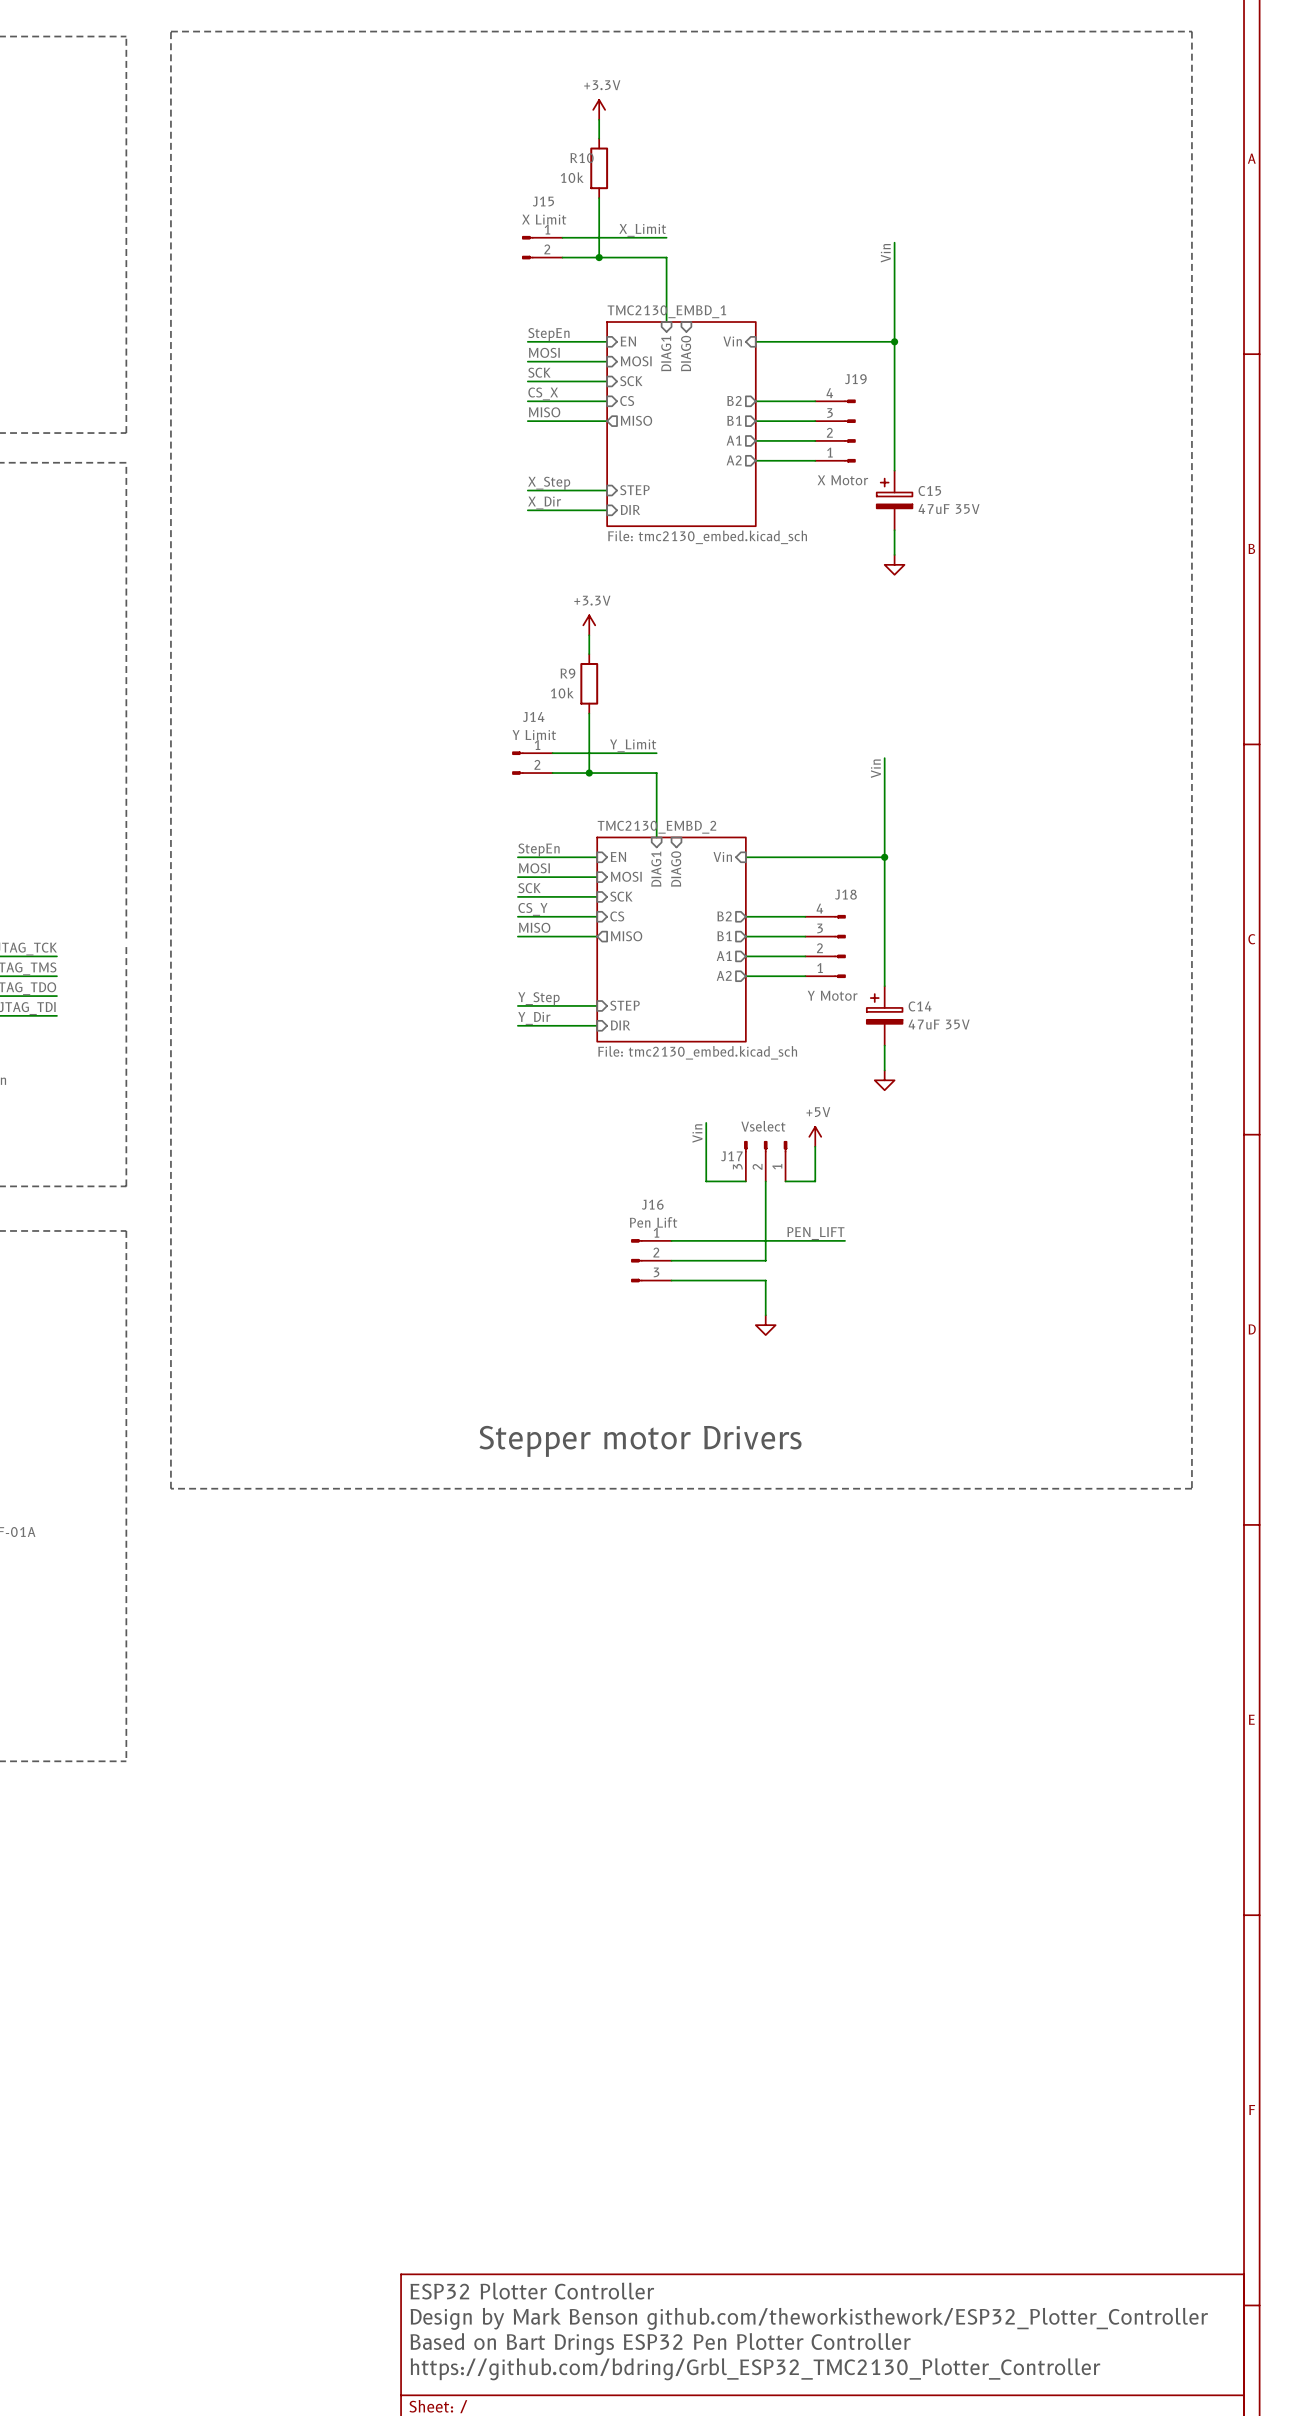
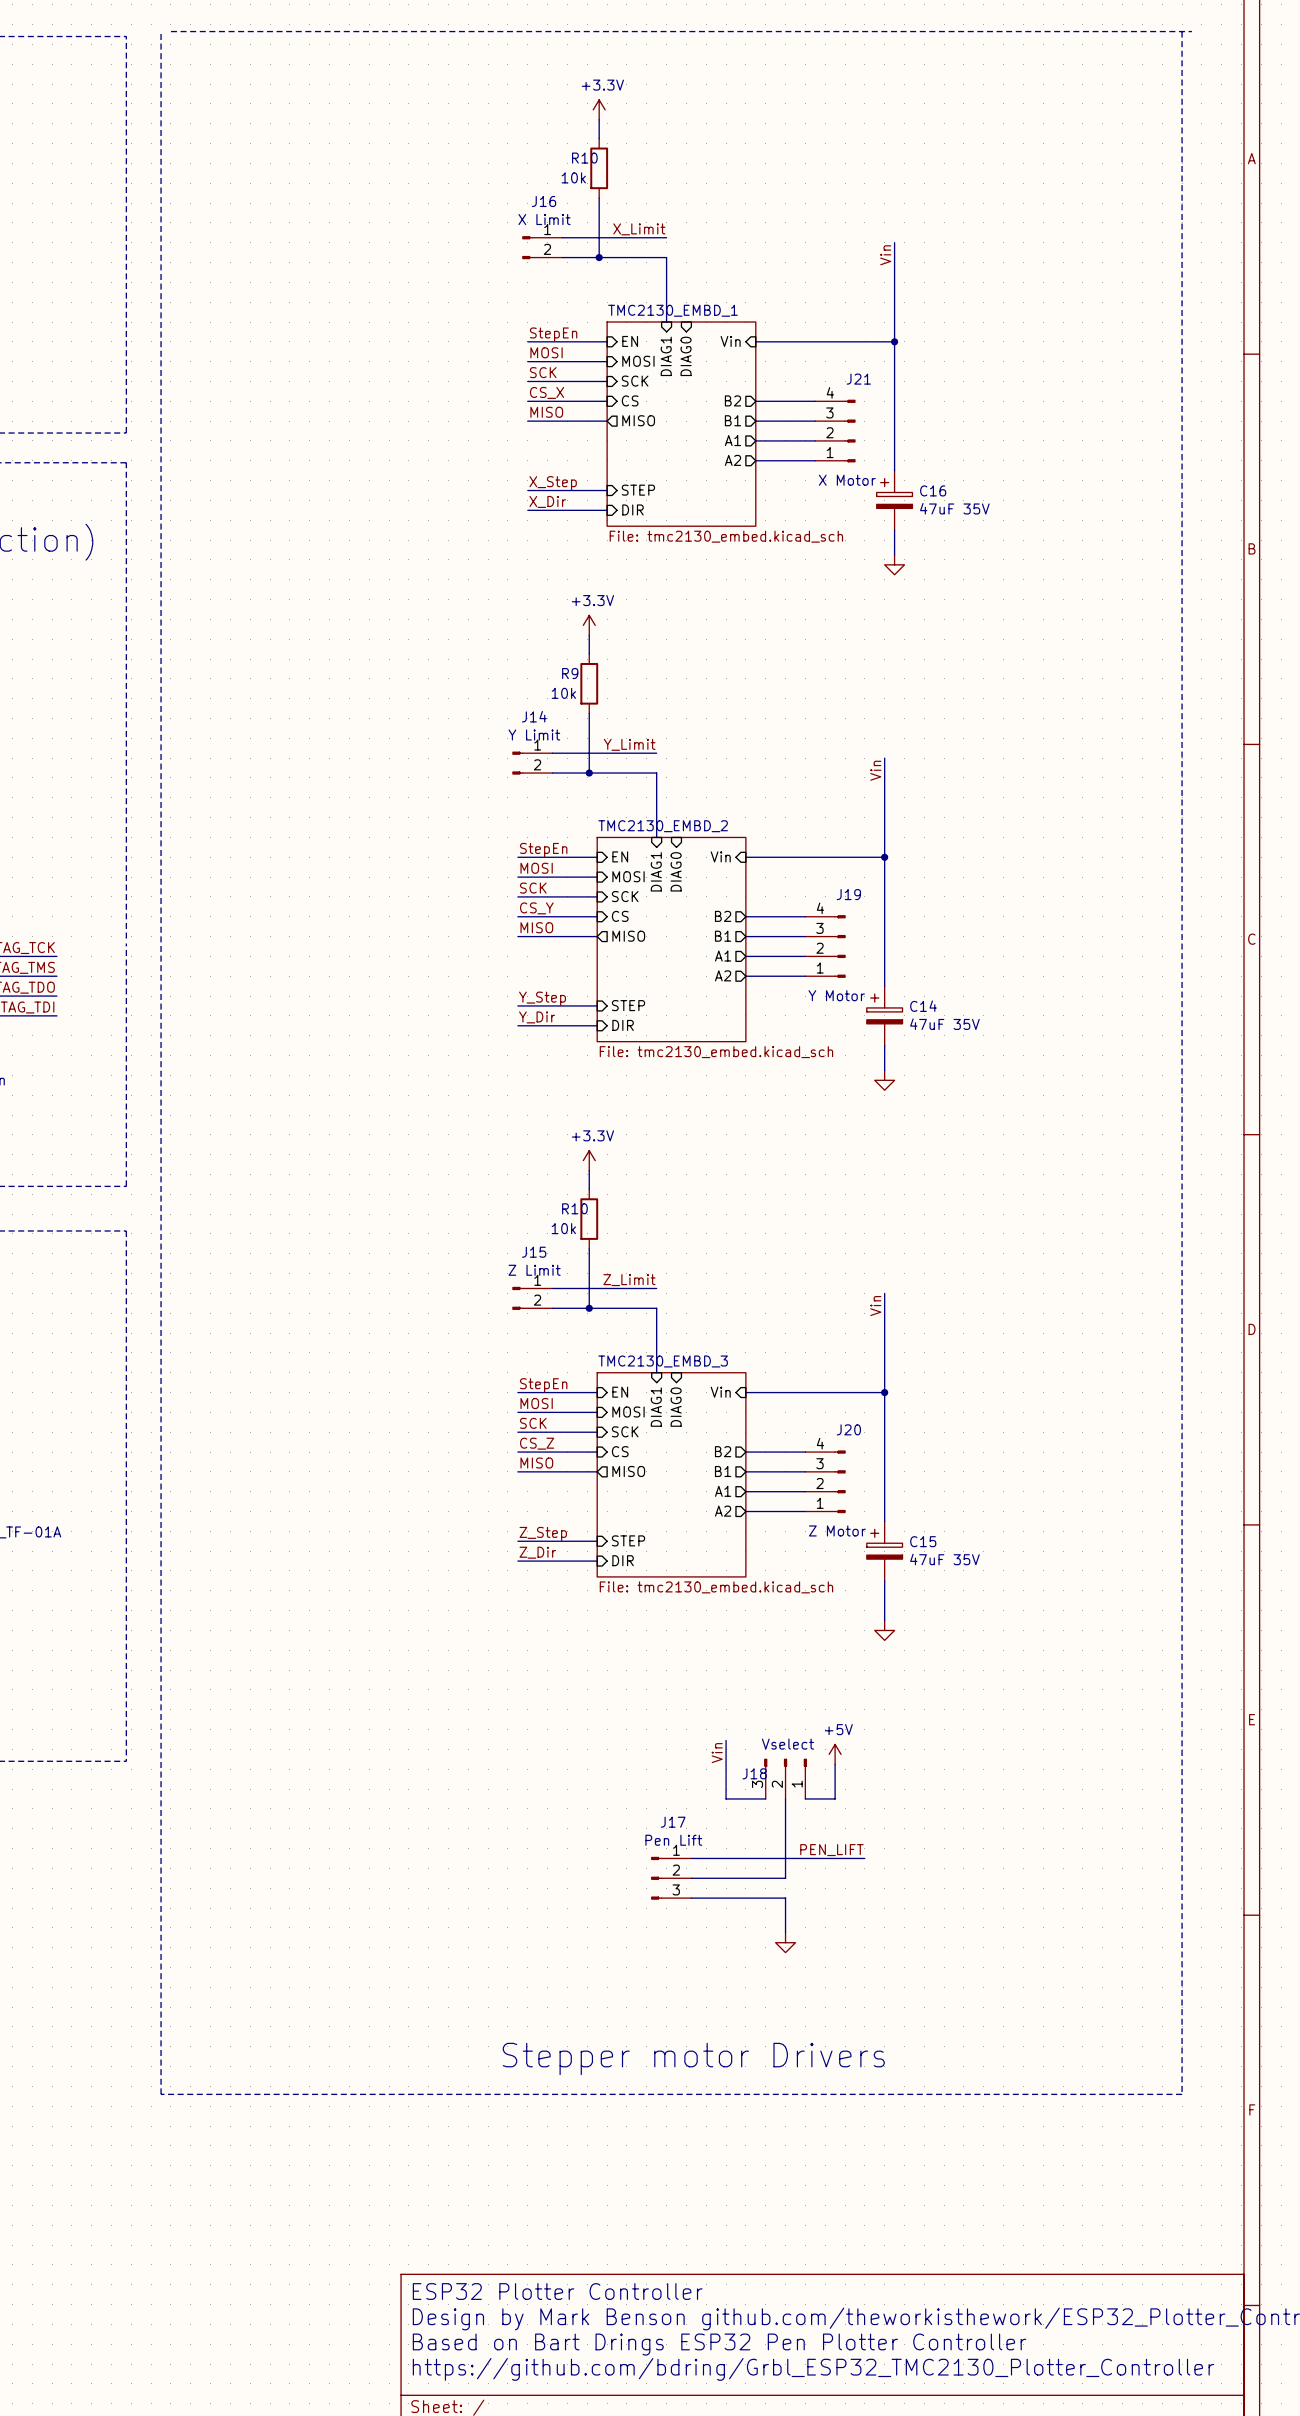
line: none -> (161, 31) (161, 2094) (1182, 2094) (1182, 31)
line: (170, 31) (170, 1488) (1191, 1488) (1191, 31) -> none
J15 name: J15 (543, 201) -> J16 (544, 201)
J19 name: J19 (855, 379) -> J21 (858, 379)
C15 name: C15 (929, 490) -> C16 (933, 490)
J18 name: J18 (845, 894) -> J19 (848, 894)
wire: (706, 1122) (706, 1181) (745, 1181) -> none
J17 value: Vselect (763, 1126) -> Pen Lift (673, 1840)
label: Vin (697, 1133) -> none
power symbol: +5V (815, 1136) -> none
J17 rotation: 0° (765, 1146) -> 90° counterclockwise (656, 1878)
wire: (815, 1146) (815, 1181) (785, 1181) -> none
J17 name position: J17 (731, 1156) -> J17 (673, 1822)
power symbol: none -> +3.3V (589, 1160)
J17 position: (765, 1161) -> (671, 1878)
wire: none -> (589, 1170) (589, 1189)
wire: (765, 1181) (765, 1260) (671, 1260) -> none
R10: none -> 10k (589, 1219)
label: PEN_LIFT (815, 1233) -> none
wire: (671, 1240) (845, 1240) -> none
wire: none -> (589, 1248) (589, 1308)
J16: Pen Lift (651, 1260) -> none
wire: (671, 1280) (765, 1280) (765, 1315) -> none
label: none -> Z_Limit (629, 1280)
wire: none -> (552, 1288) (656, 1288)
wire: none -> (884, 1293) (884, 1521)
J15: none -> Z Limit (532, 1298)
label: none -> Vin (875, 1306)
wire: none -> (552, 1308) (656, 1308) (656, 1372)
junction: none -> (589, 1308)
power symbol: (765, 1325) -> none
label: none -> StepEn (543, 1385)
wire: none -> (517, 1392) (597, 1392)
sheet pin: none -> EN (620, 1392)
sheet pin: none -> Vin (720, 1392)
wire: none -> (745, 1392) (884, 1392)
junction: none -> (884, 1392)
label: none -> MOSI (536, 1403)
sheet pin: none -> DIAG1 (656, 1407)
sheet pin: none -> DIAG0 (676, 1407)
wire: none -> (517, 1412) (597, 1412)
sheet pin: none -> MOSI (628, 1412)
label: none -> SCK (533, 1423)
sheet pin: none -> SCK (625, 1431)
wire: none -> (517, 1432) (597, 1432)
text: Stepper motor Drivers (640, 1441) -> none
label: none -> CS_Z (537, 1443)
sheet pin: none -> CS (620, 1451)
sheet pin: none -> B2 (723, 1451)
wire: none -> (517, 1452) (597, 1452)
wire: none -> (745, 1452) (805, 1452)
label: none -> MISO (536, 1463)
wire: none -> (517, 1471) (597, 1471)
sheet pin: none -> MISO (628, 1471)
sheet pin: none -> B1 (723, 1471)
wire: none -> (745, 1471) (805, 1471)
sheet TMC2130_EMBD_3: none -> File: tmc2130_embed.kicad_sch (671, 1474)
J20: none -> Z Motor (825, 1481)
sheet pin: none -> A1 (723, 1491)
wire: none -> (745, 1491) (805, 1491)
sheet pin: none -> A2 (723, 1511)
wire: none -> (745, 1511) (805, 1511)
label: none -> Z_Step (543, 1534)
sheet pin: none -> STEP (628, 1540)
wire: none -> (517, 1541) (597, 1541)
C15: none -> 47uF 35V (884, 1551)
label: none -> Z_Dir (537, 1552)
sheet pin: none -> DIR (623, 1560)
wire: none -> (517, 1561) (597, 1561)
wire: none -> (884, 1580) (884, 1620)
power symbol: none -> (884, 1630)
wire: none -> (726, 1740) (726, 1798) (765, 1798)
label: none -> Vin (717, 1753)
power symbol: none -> +5V (835, 1754)
wire: none -> (835, 1764) (835, 1798) (805, 1798)
J18: none -> Vselect (785, 1778)
wire: none -> (785, 1798) (785, 1878) (691, 1878)
label: none -> PEN_LIFT (831, 1850)
wire: none -> (691, 1858) (864, 1858)
wire: none -> (691, 1898) (785, 1898) (785, 1932)
power symbol: none -> (785, 1942)
text: none -> Stepper motor Drivers (693, 2058)

